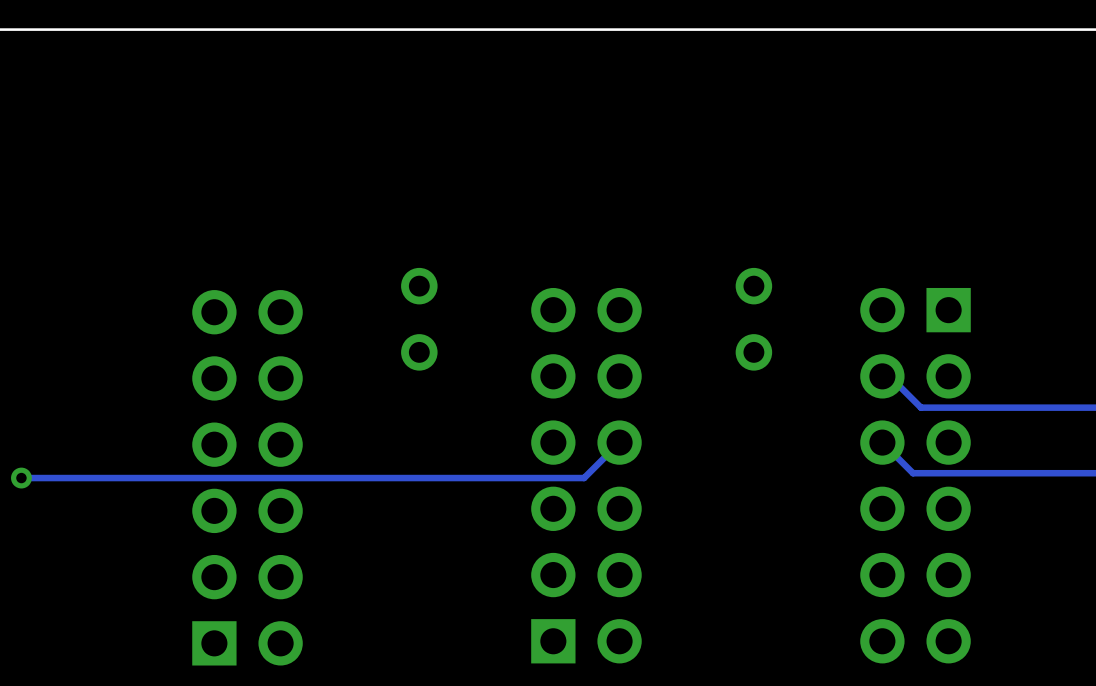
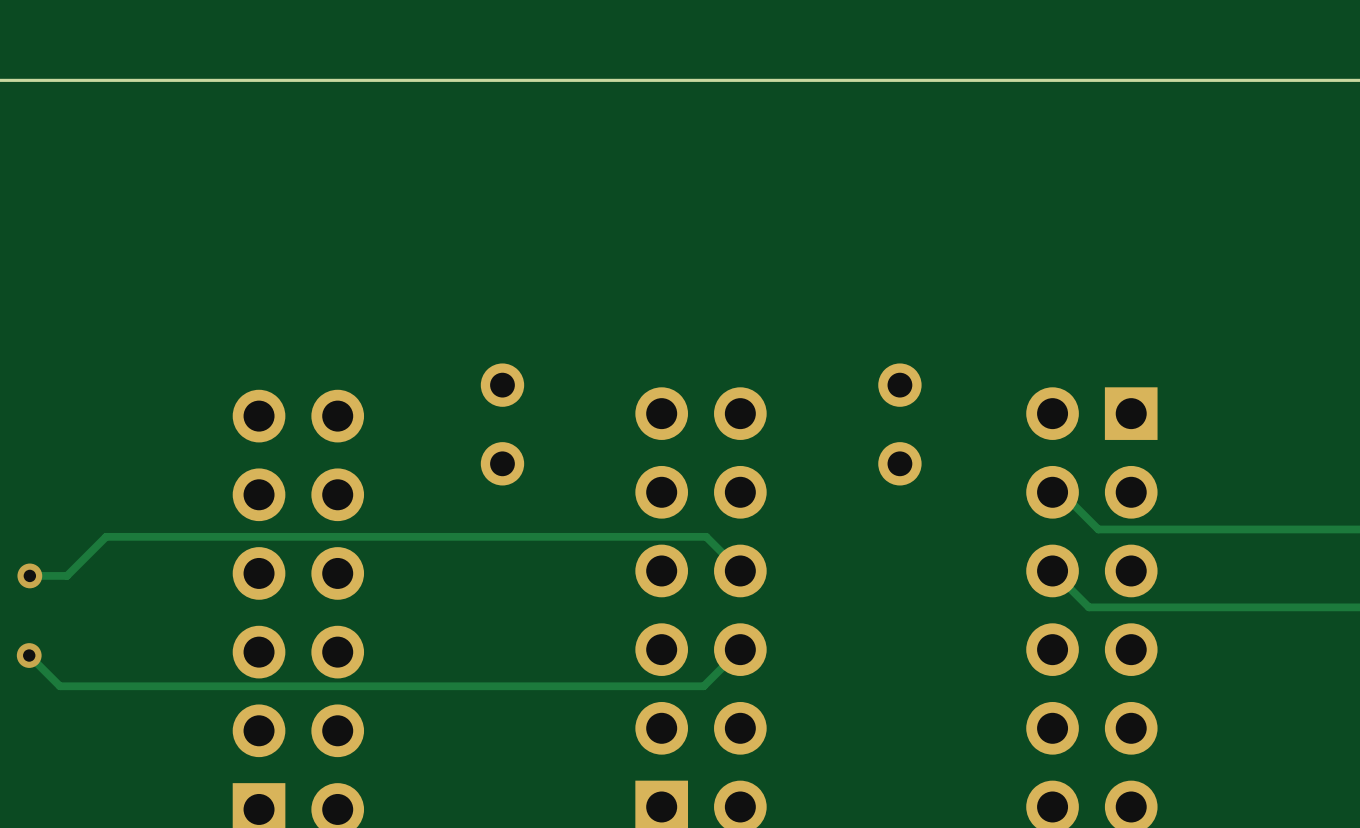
track: (619, 442) (584, 478) (21, 478) -> (740, 570) (706, 536) (106, 536) (67, 575) (29, 575)
via: none -> (29, 575)
via: (21, 478) -> none
track: none -> (740, 649) (703, 686) (59, 686) (29, 655)
via: none -> (29, 655)

